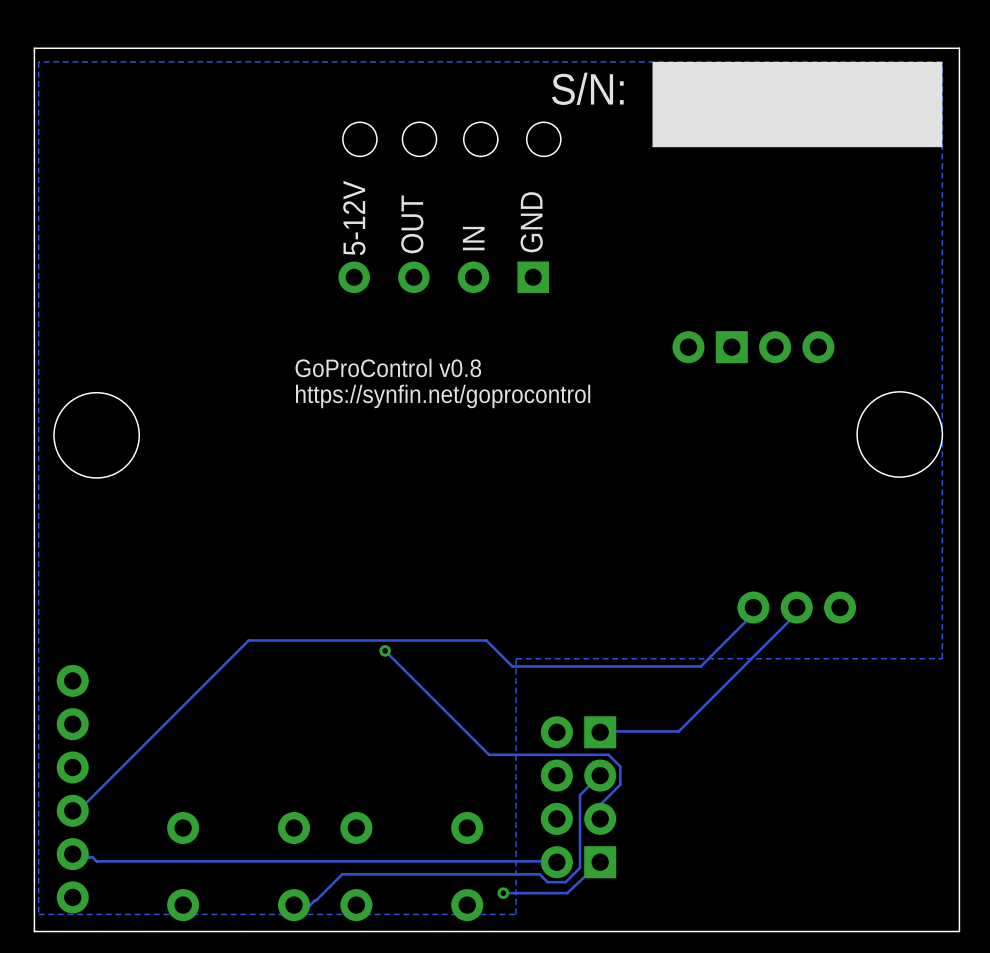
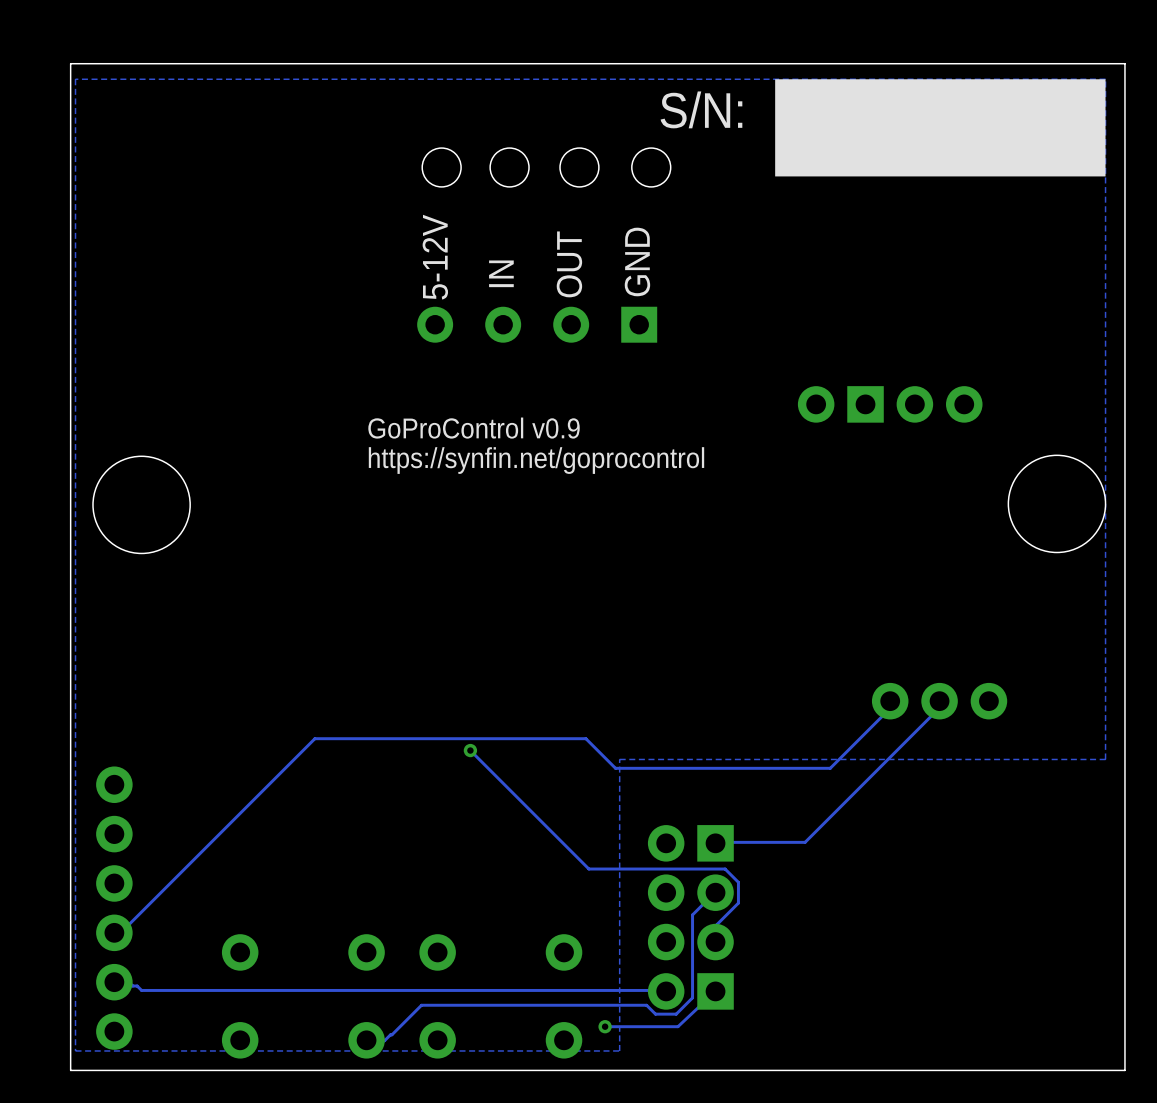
text position: OUT (412, 224) -> OUT (569, 264)
text position: IN (473, 238) -> IN (501, 273)
text: GoProControl v0.8 (388, 367) -> GoProControl v0.9 (474, 428)

